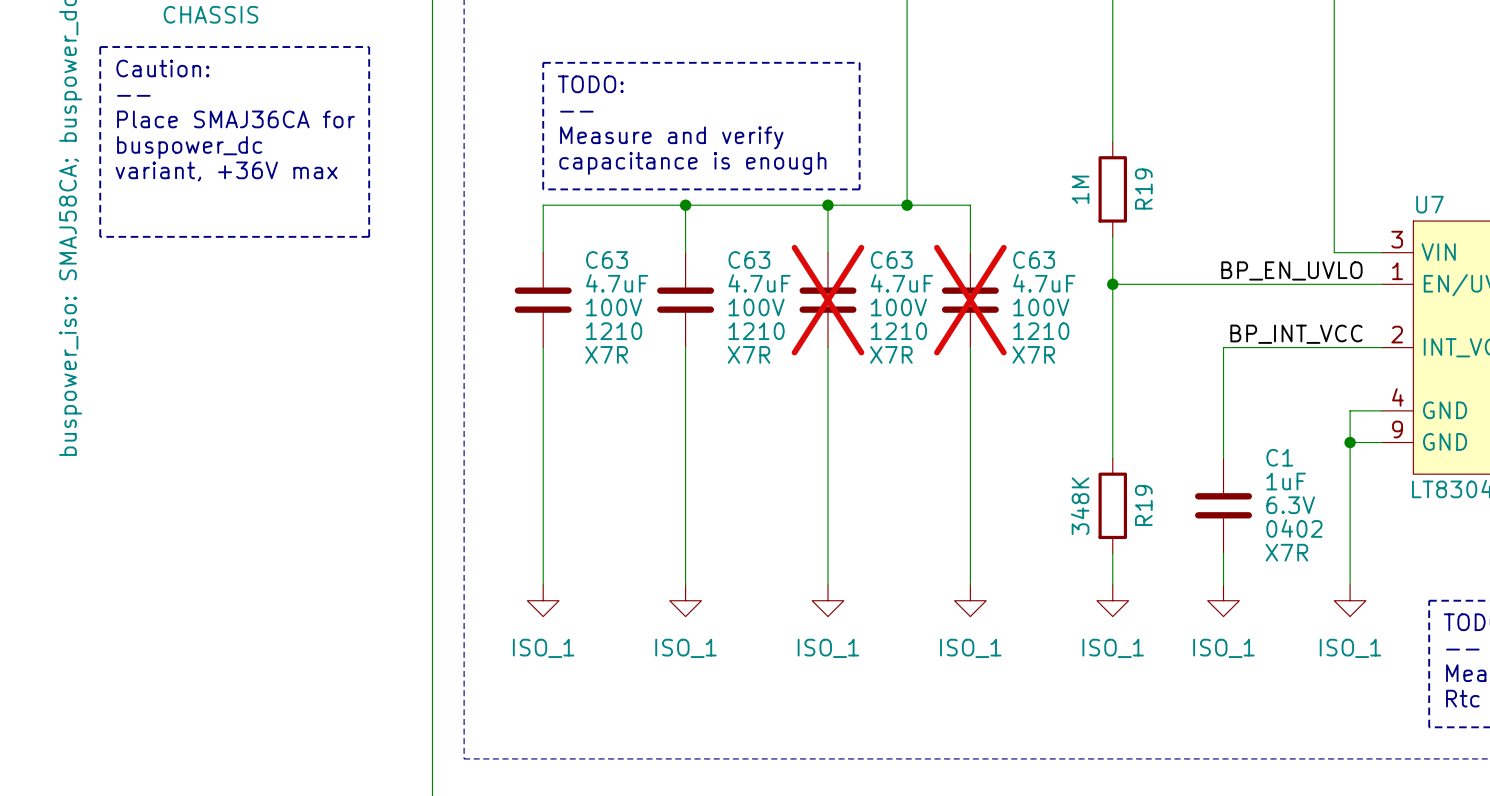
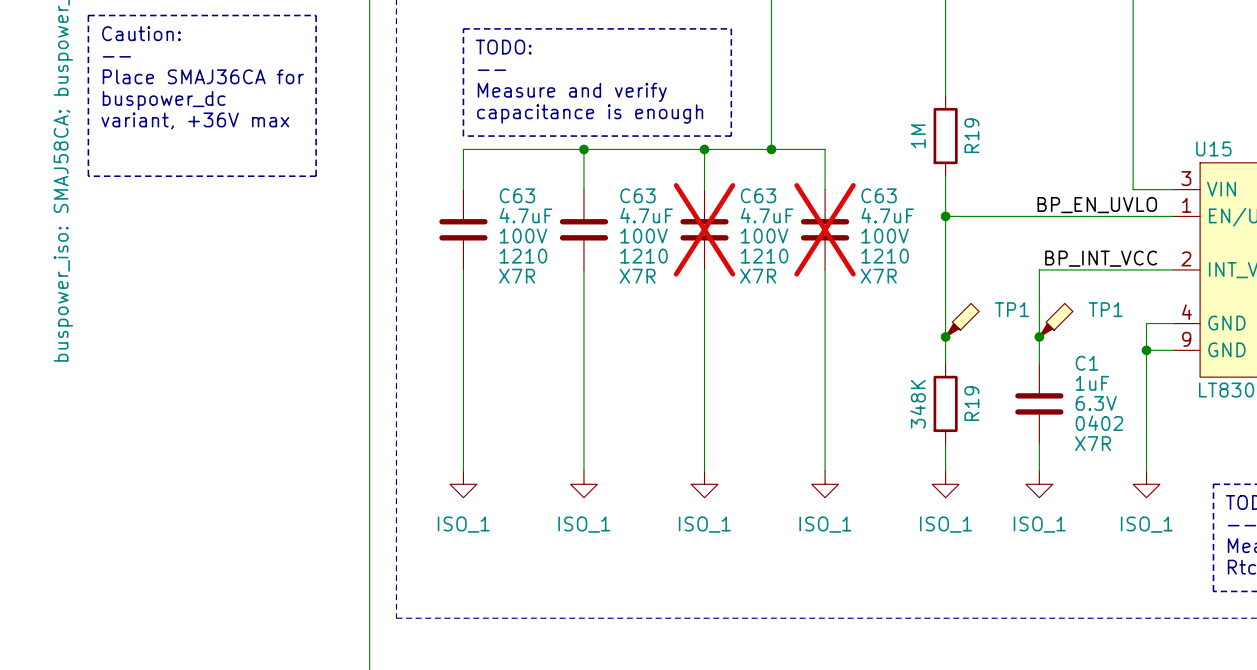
U7 name: U7 (1429, 204) -> U15 (1213, 148)
TP1: none -> (962, 320)
TP1: none -> (1056, 320)
junction: none -> (945, 336)
junction: none -> (1039, 336)

